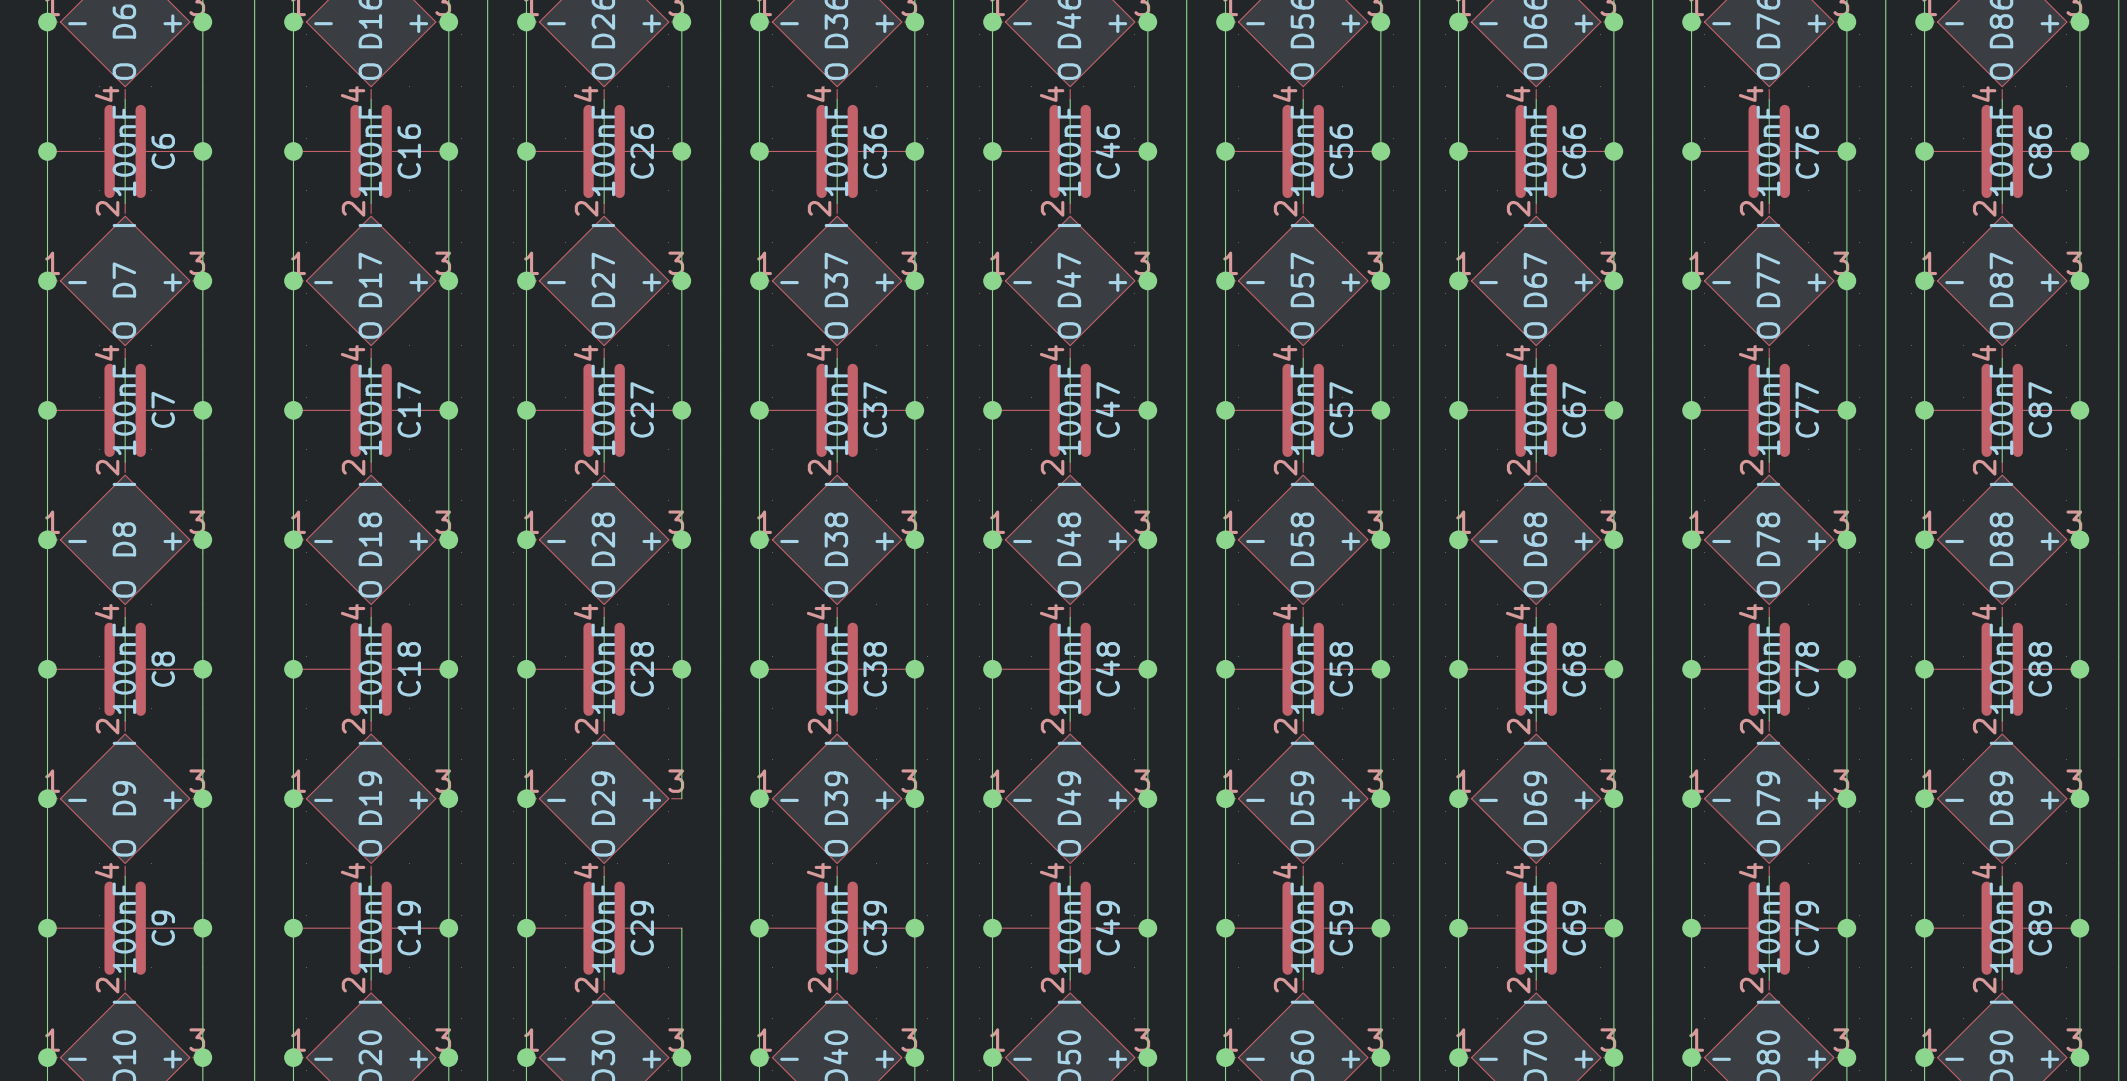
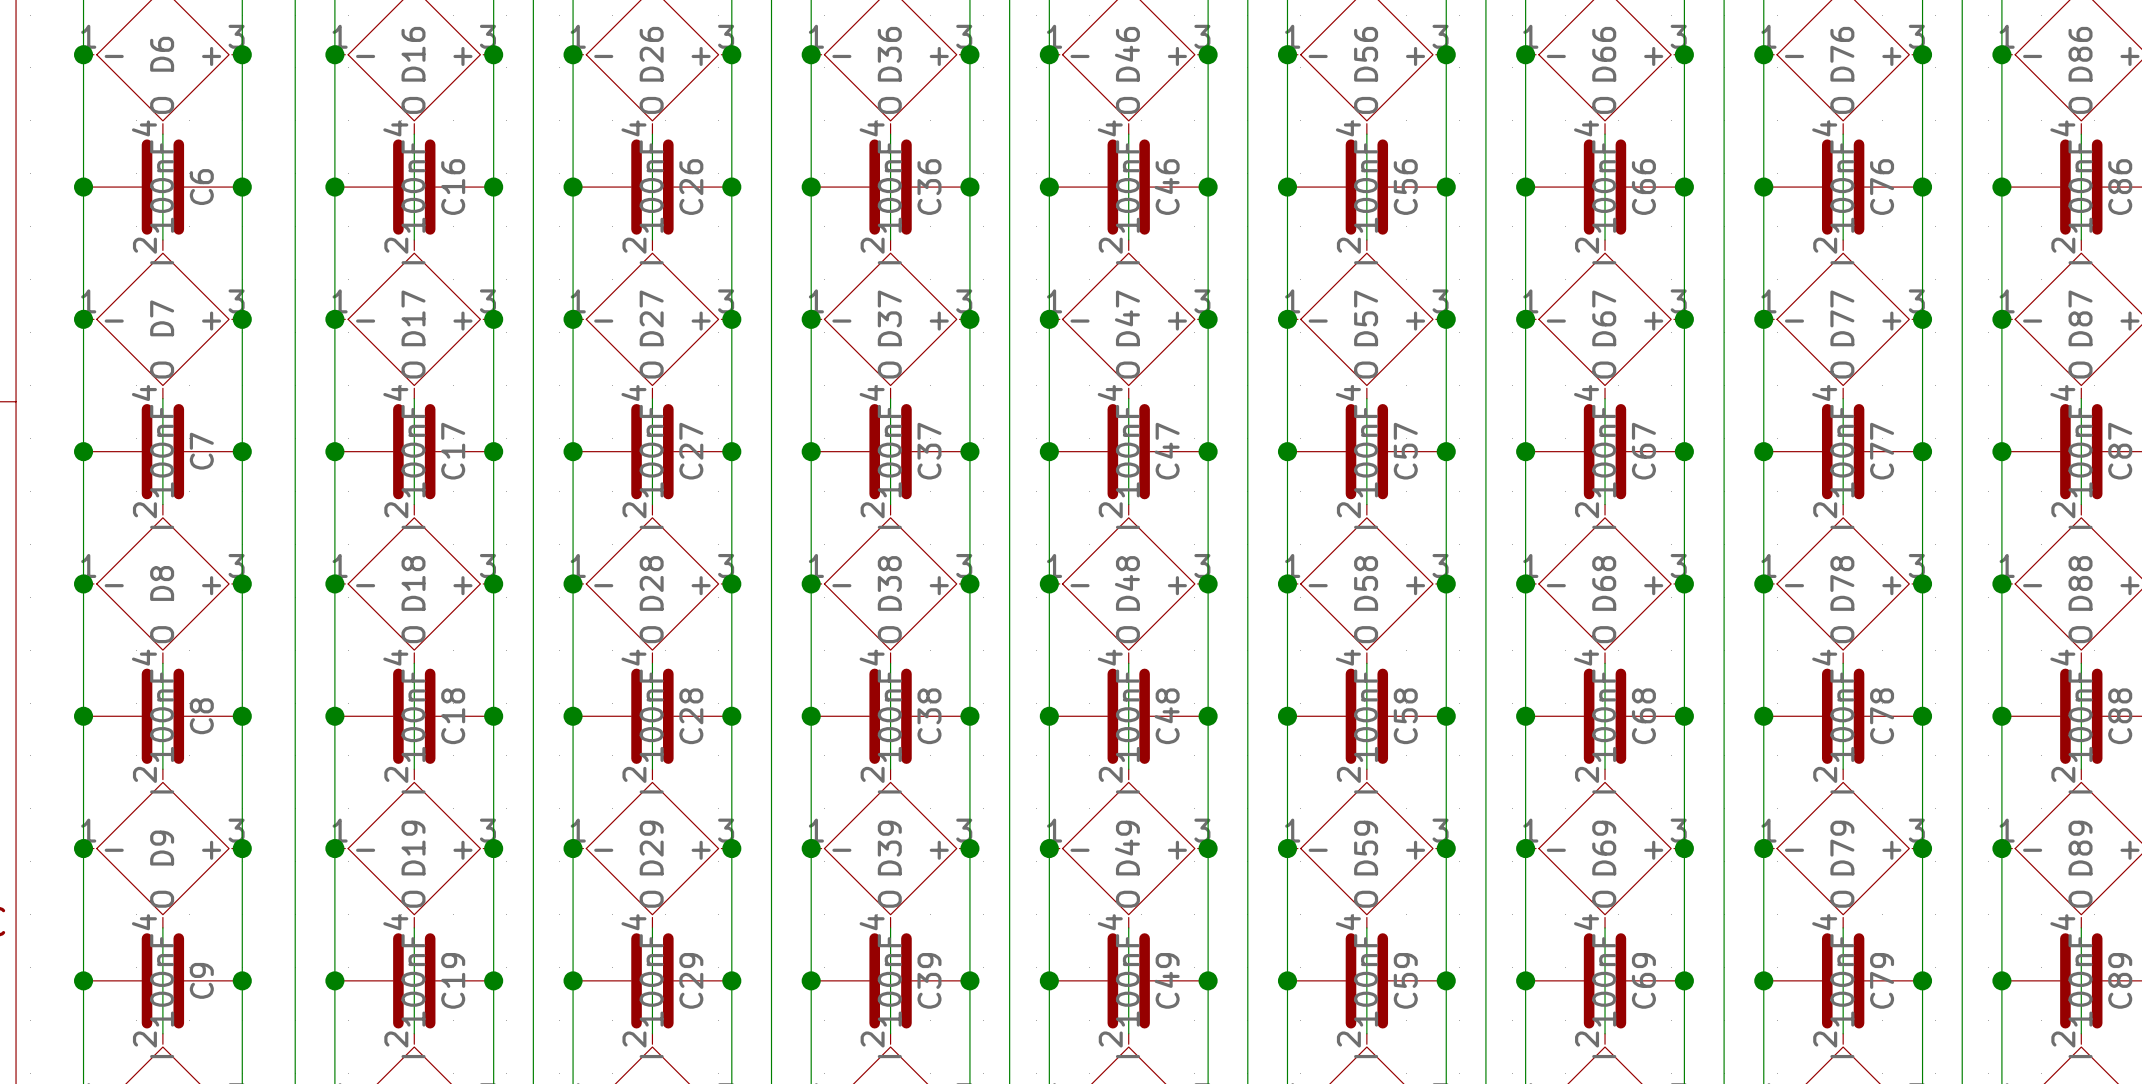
wire: none -> (731, 848) (731, 980)
junction: none -> (731, 848)
junction: none -> (731, 980)

